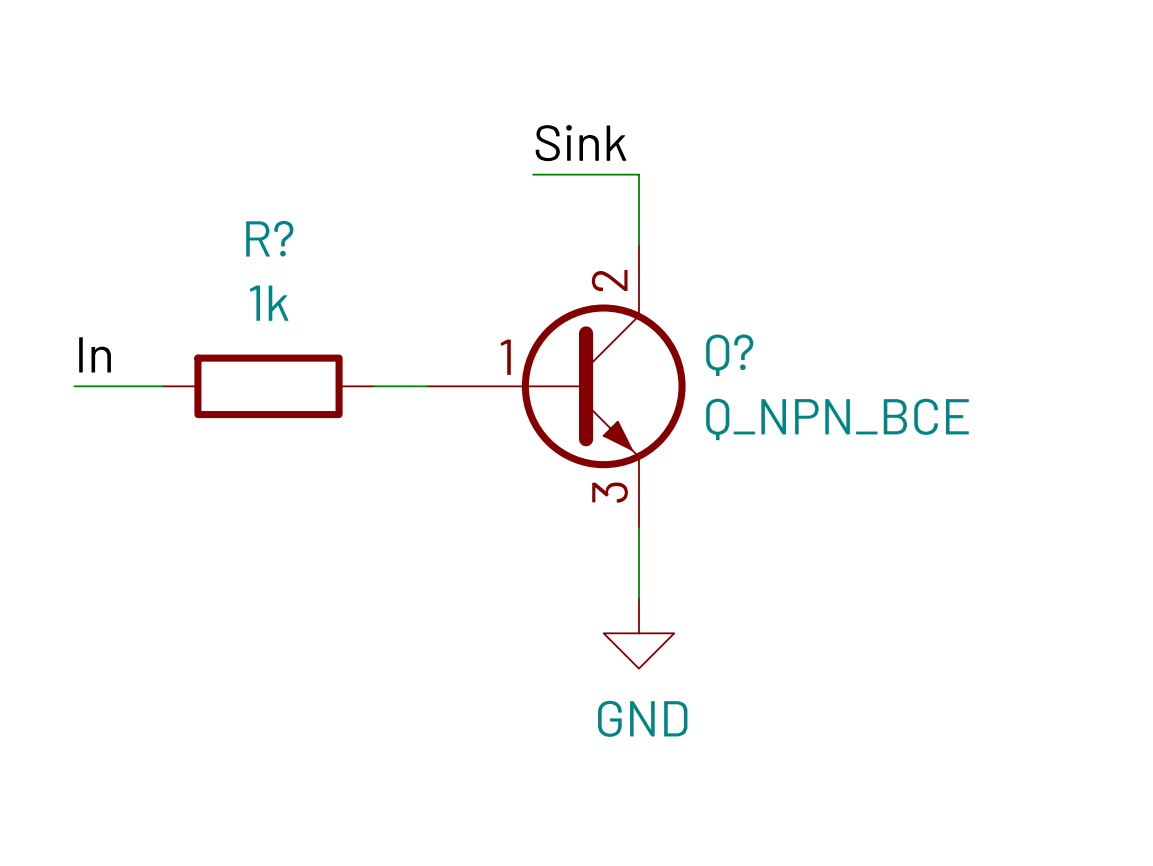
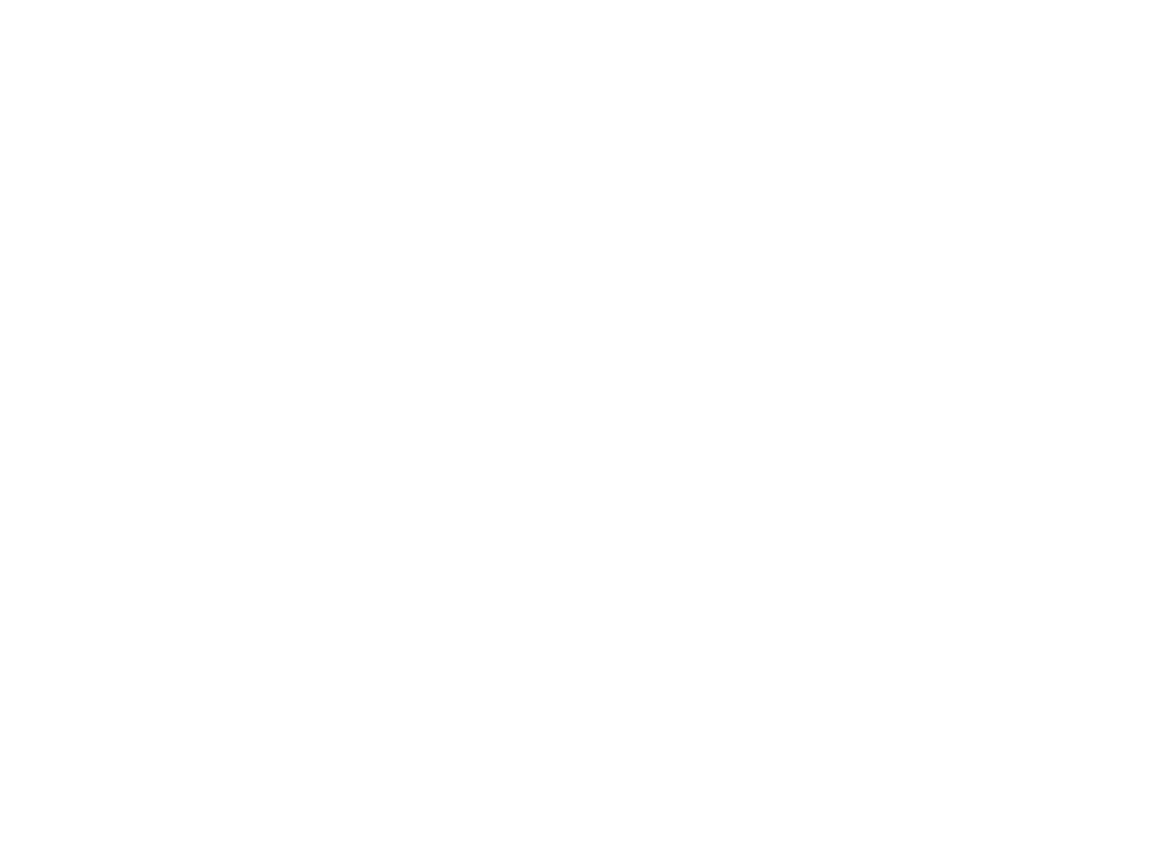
label: Sink (581, 143) -> none
wire: (533, 174) (638, 174) (638, 245) -> none
label: In (95, 354) -> none
wire: (74, 386) (162, 386) -> none
R?: 1k (268, 386) -> none
wire: (374, 386) (427, 386) -> none
Q?: Q_NPN_BCE (556, 386) -> none
wire: (638, 527) (638, 598) -> none
power symbol: GND (638, 633) -> none

